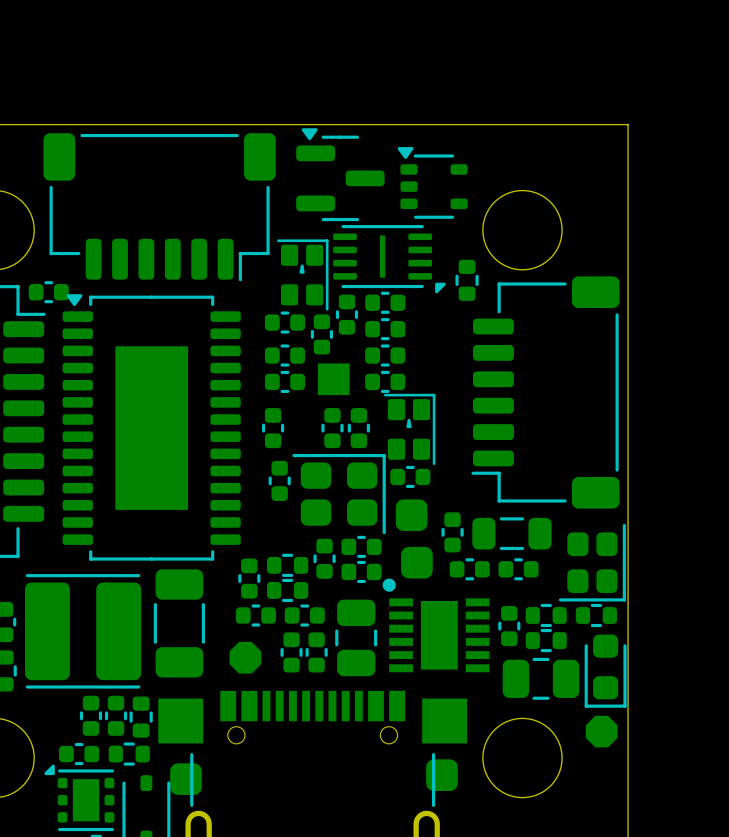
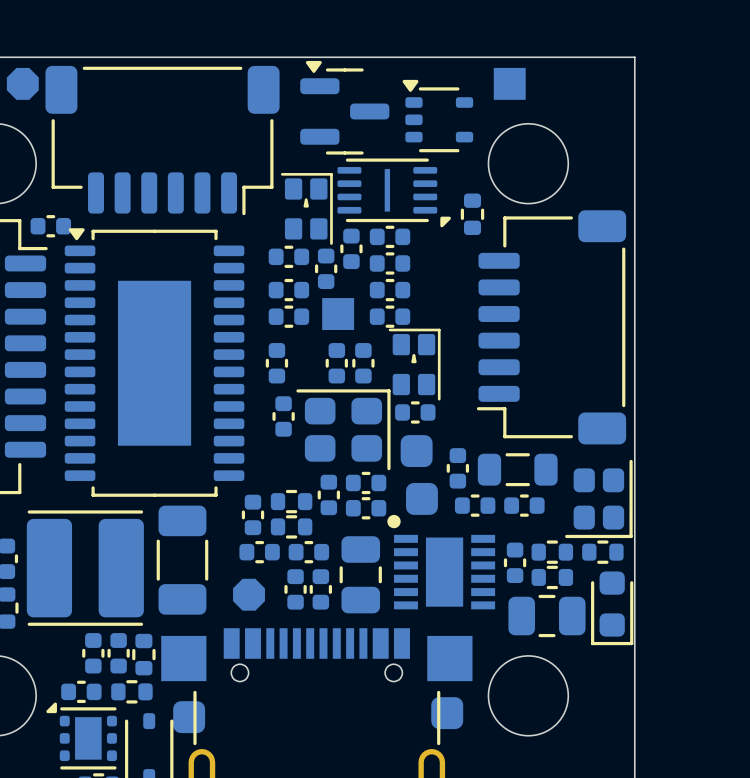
part: none -> (22, 83)
part: none -> (509, 83)
part: (601, 731) -> none

